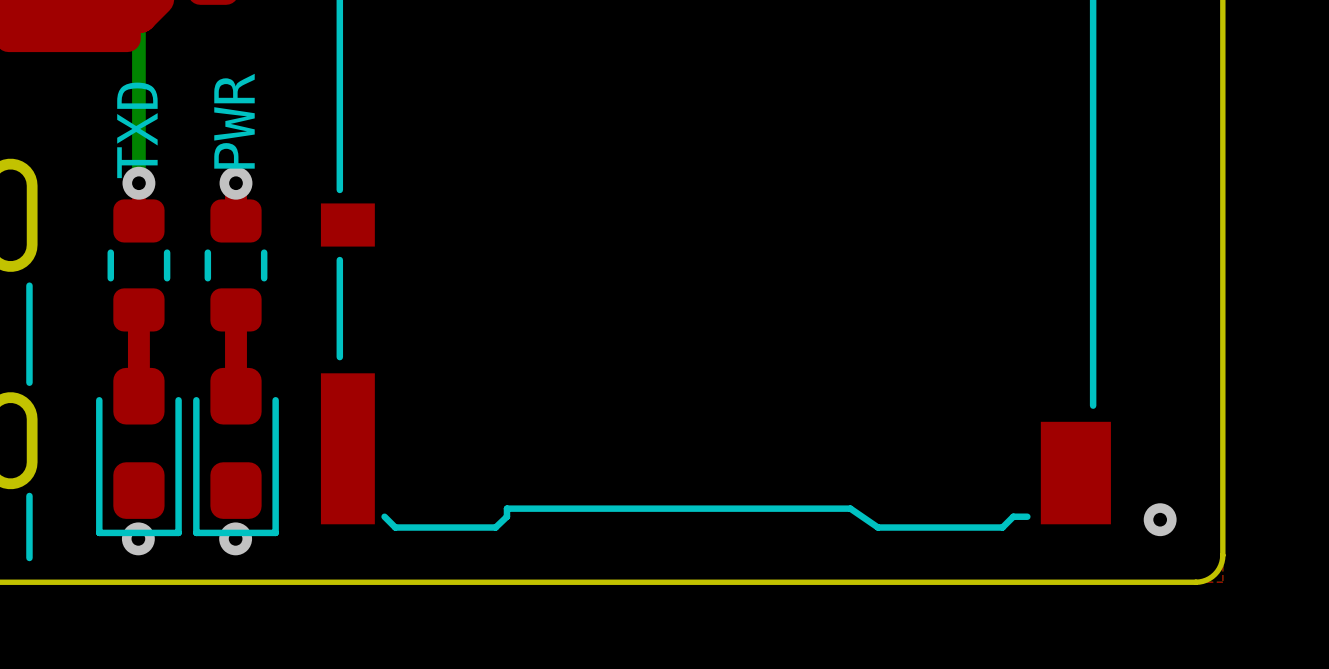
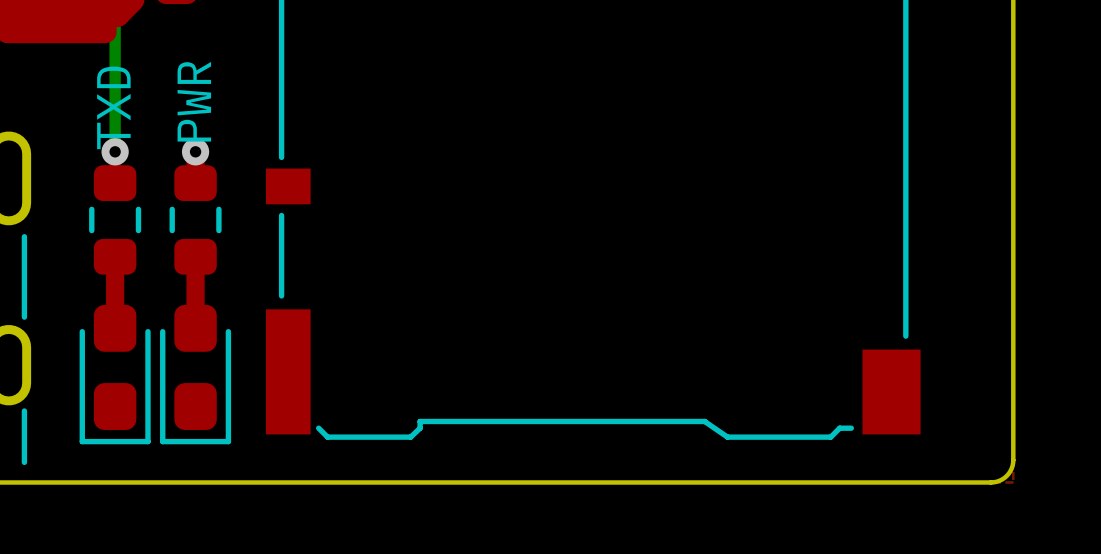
via: (1160, 519) -> none
via: (138, 538) -> none
via: (235, 538) -> none

